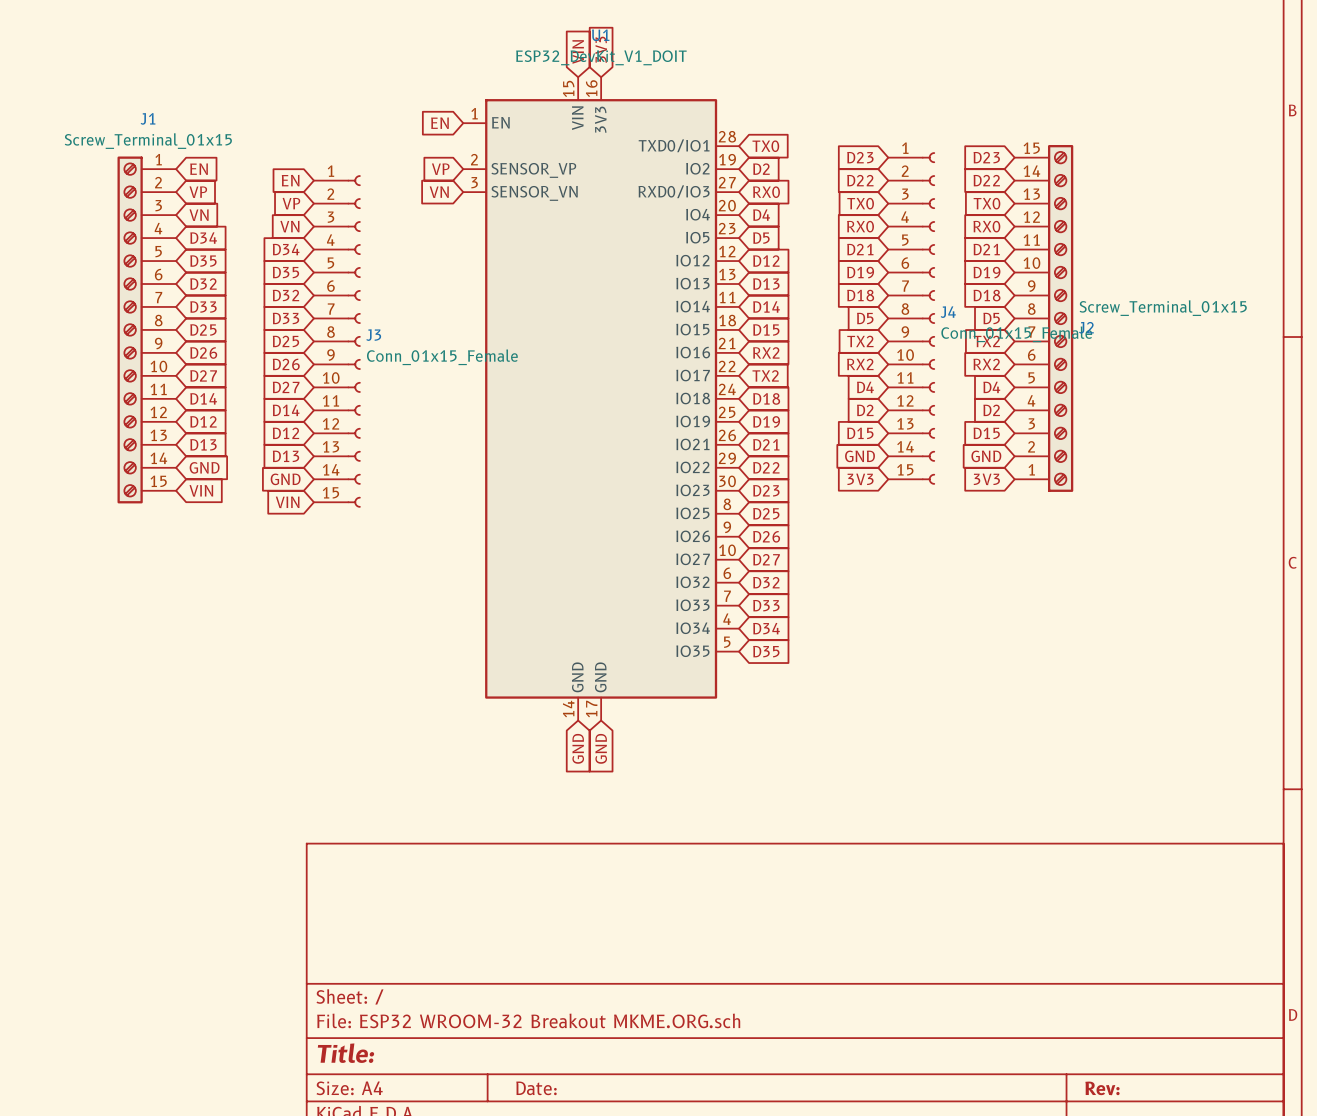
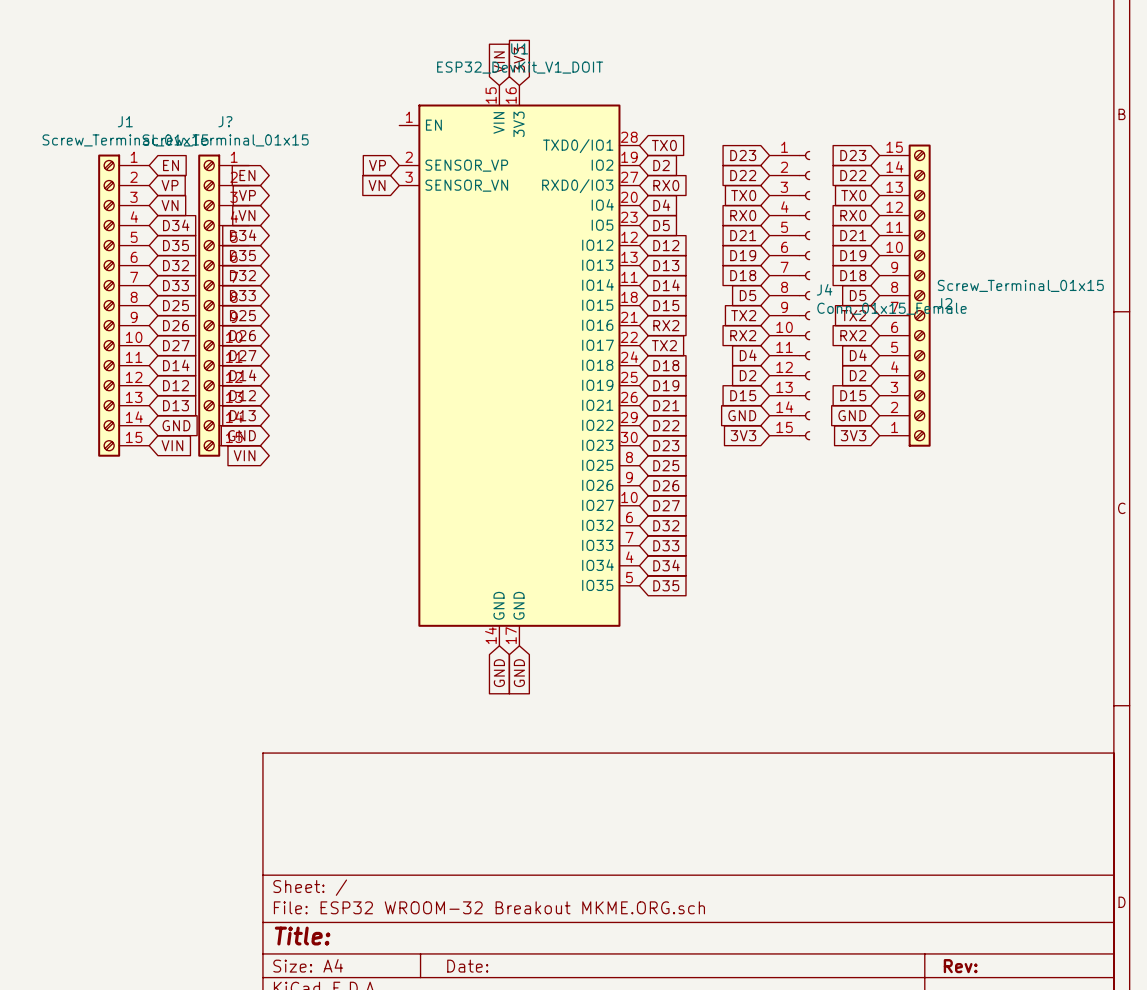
global label: EN (439, 123) -> none
J?: none -> Screw_Terminal_01x15 (223, 305)
J3: Conn_01x15_Female (337, 341) -> none

